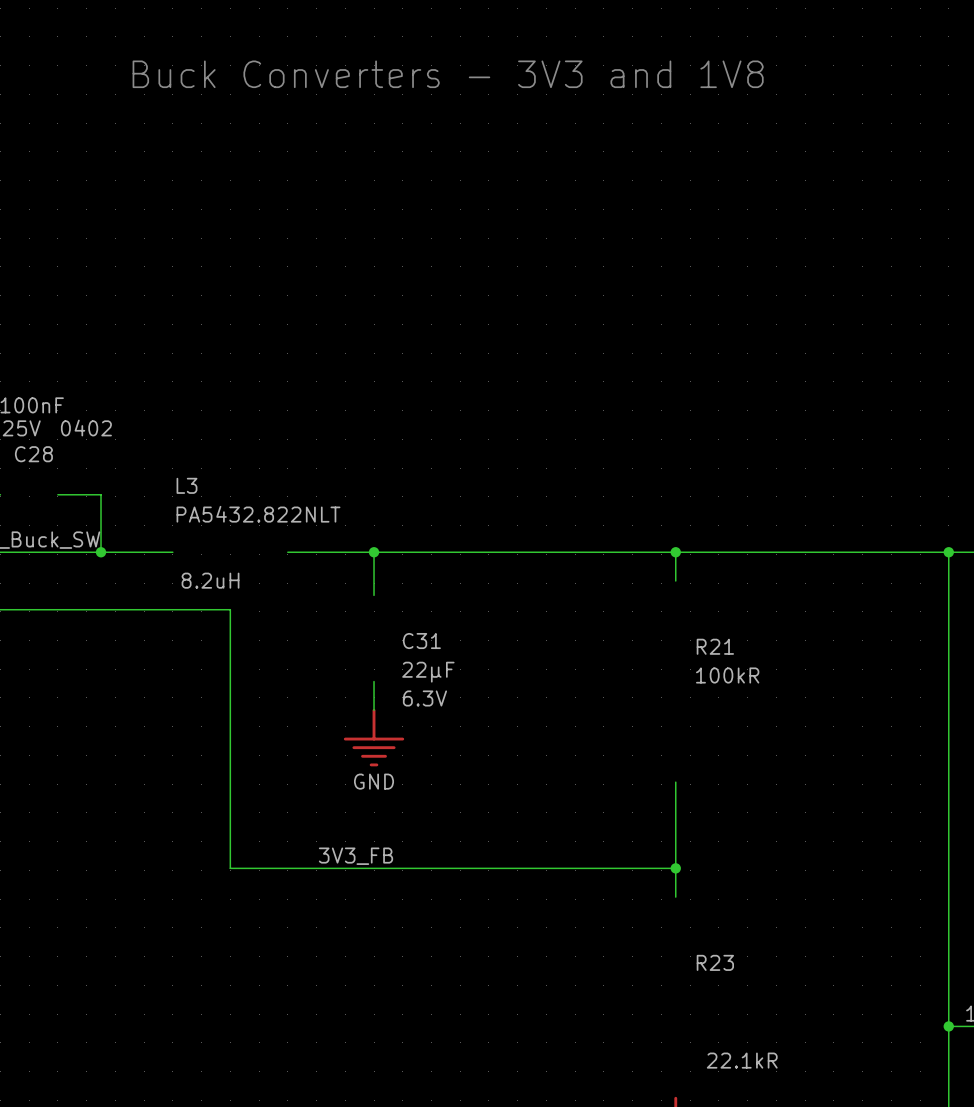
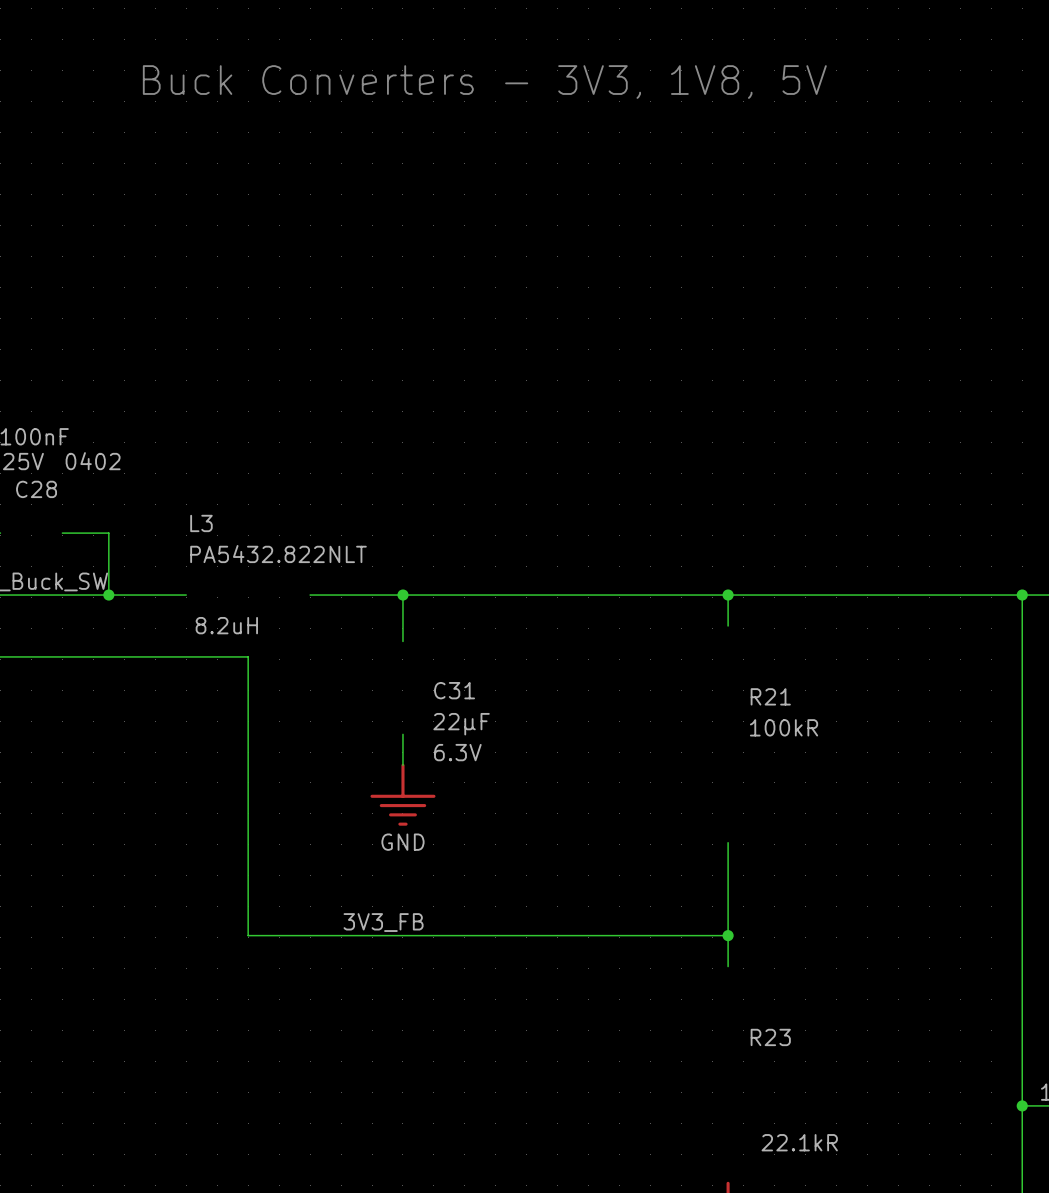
text: Buck Converters - 3V3 and 1V8 (448, 74) -> Buck Converters - 3V3, 1V8, 5V (484, 82)

